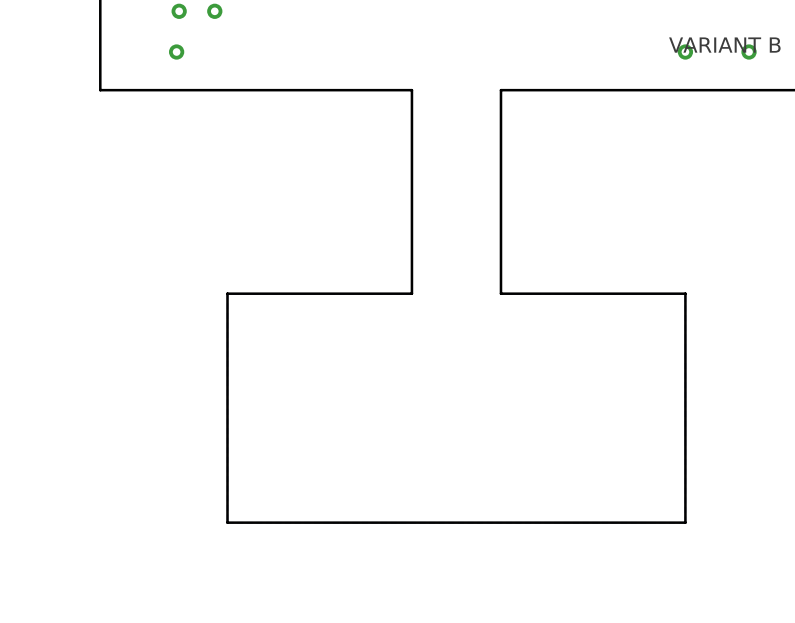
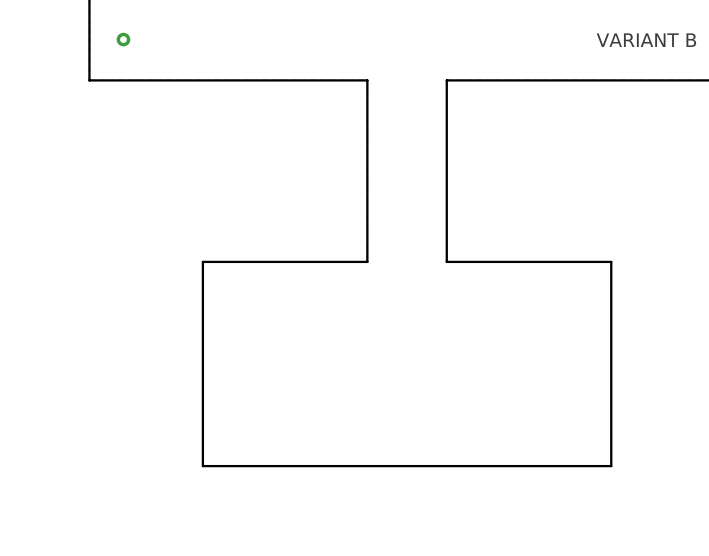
via: (179, 11) -> none
via: (214, 11) -> none
via: none -> (123, 39)
via: (176, 52) -> none
via: (685, 52) -> none
via: (749, 52) -> none

